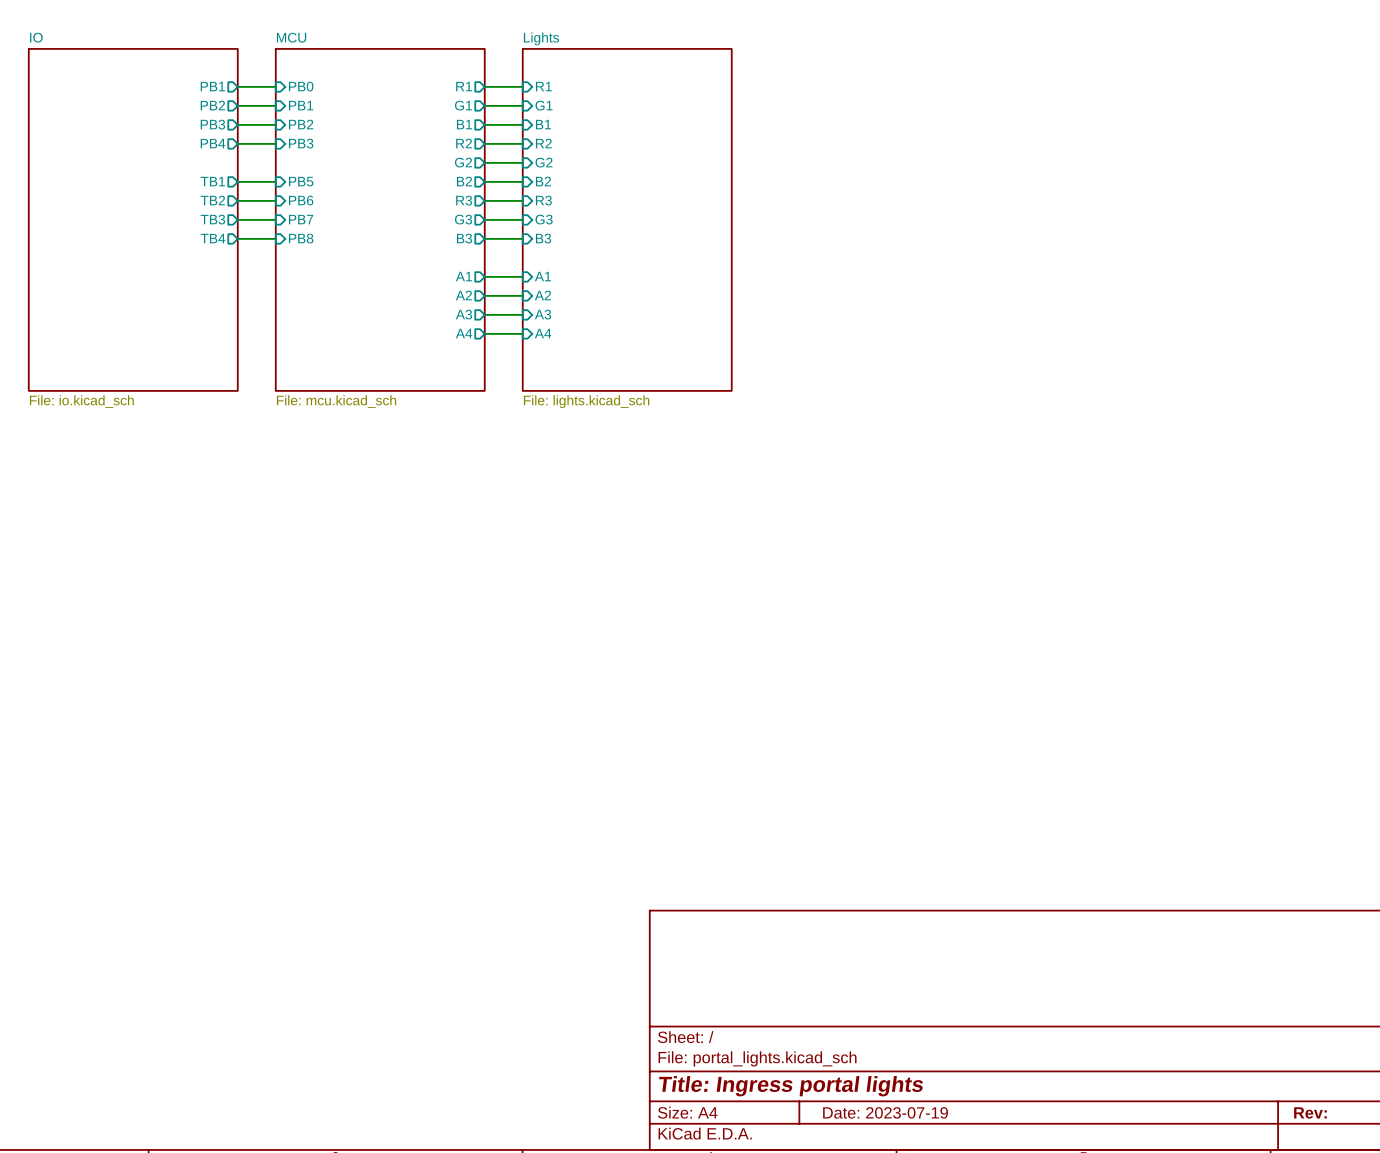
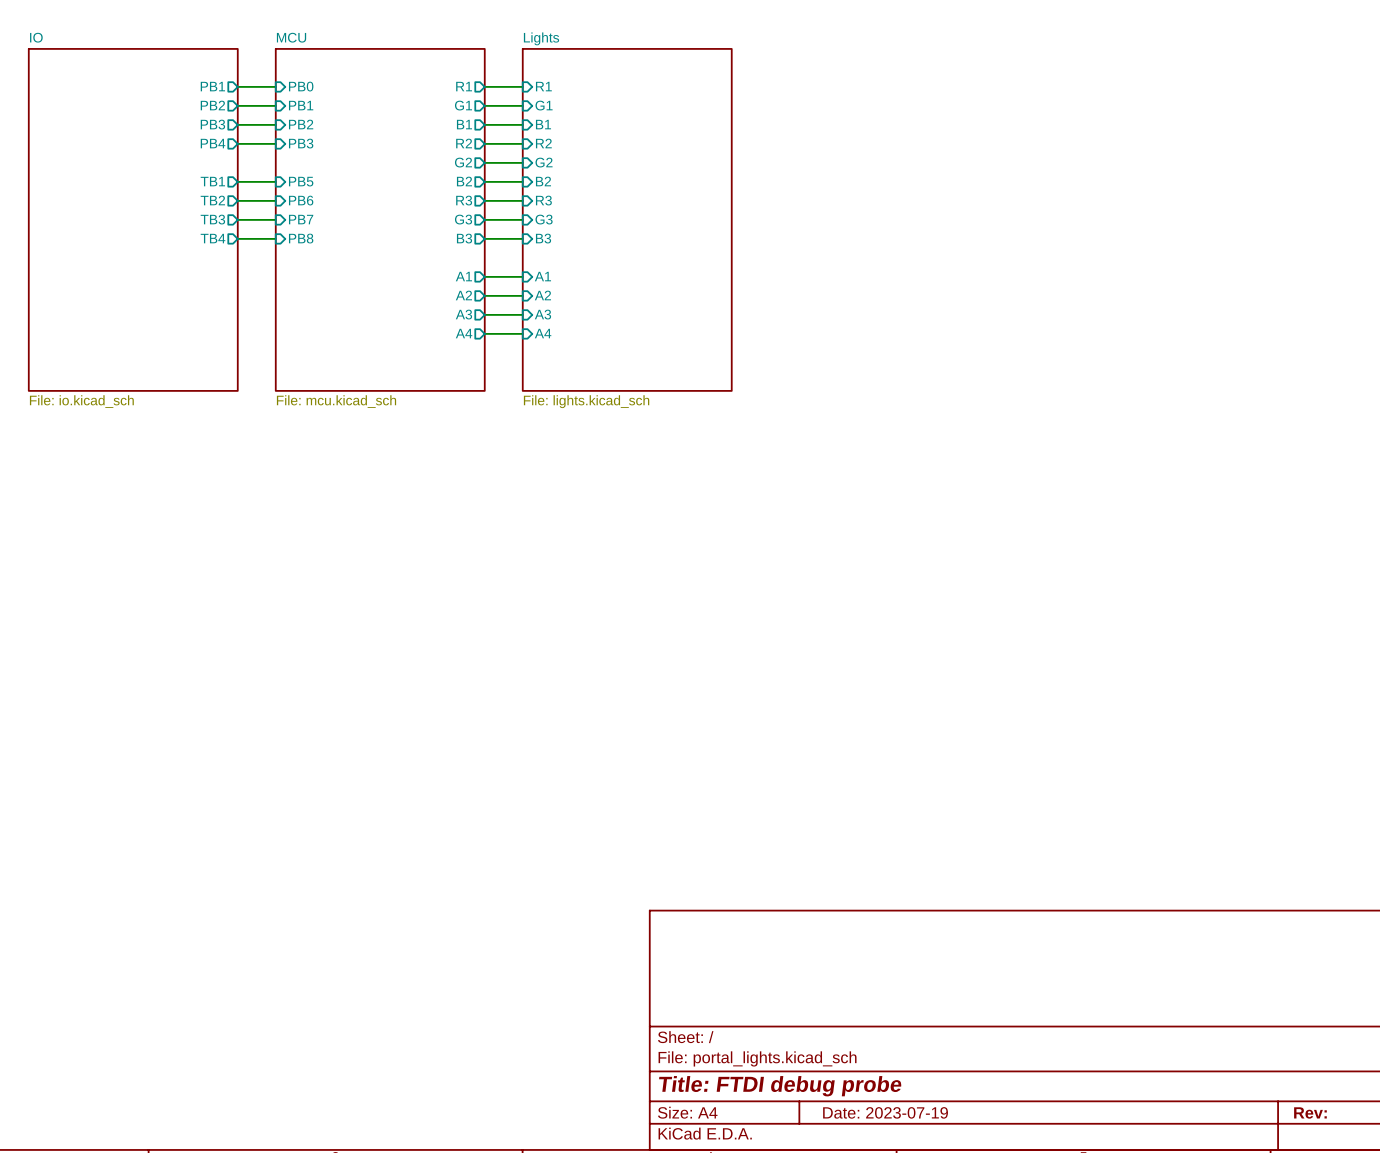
title block: Title: Ingress portal lights (791, 1086) -> Title: FTDI debug probe (780, 1086)

